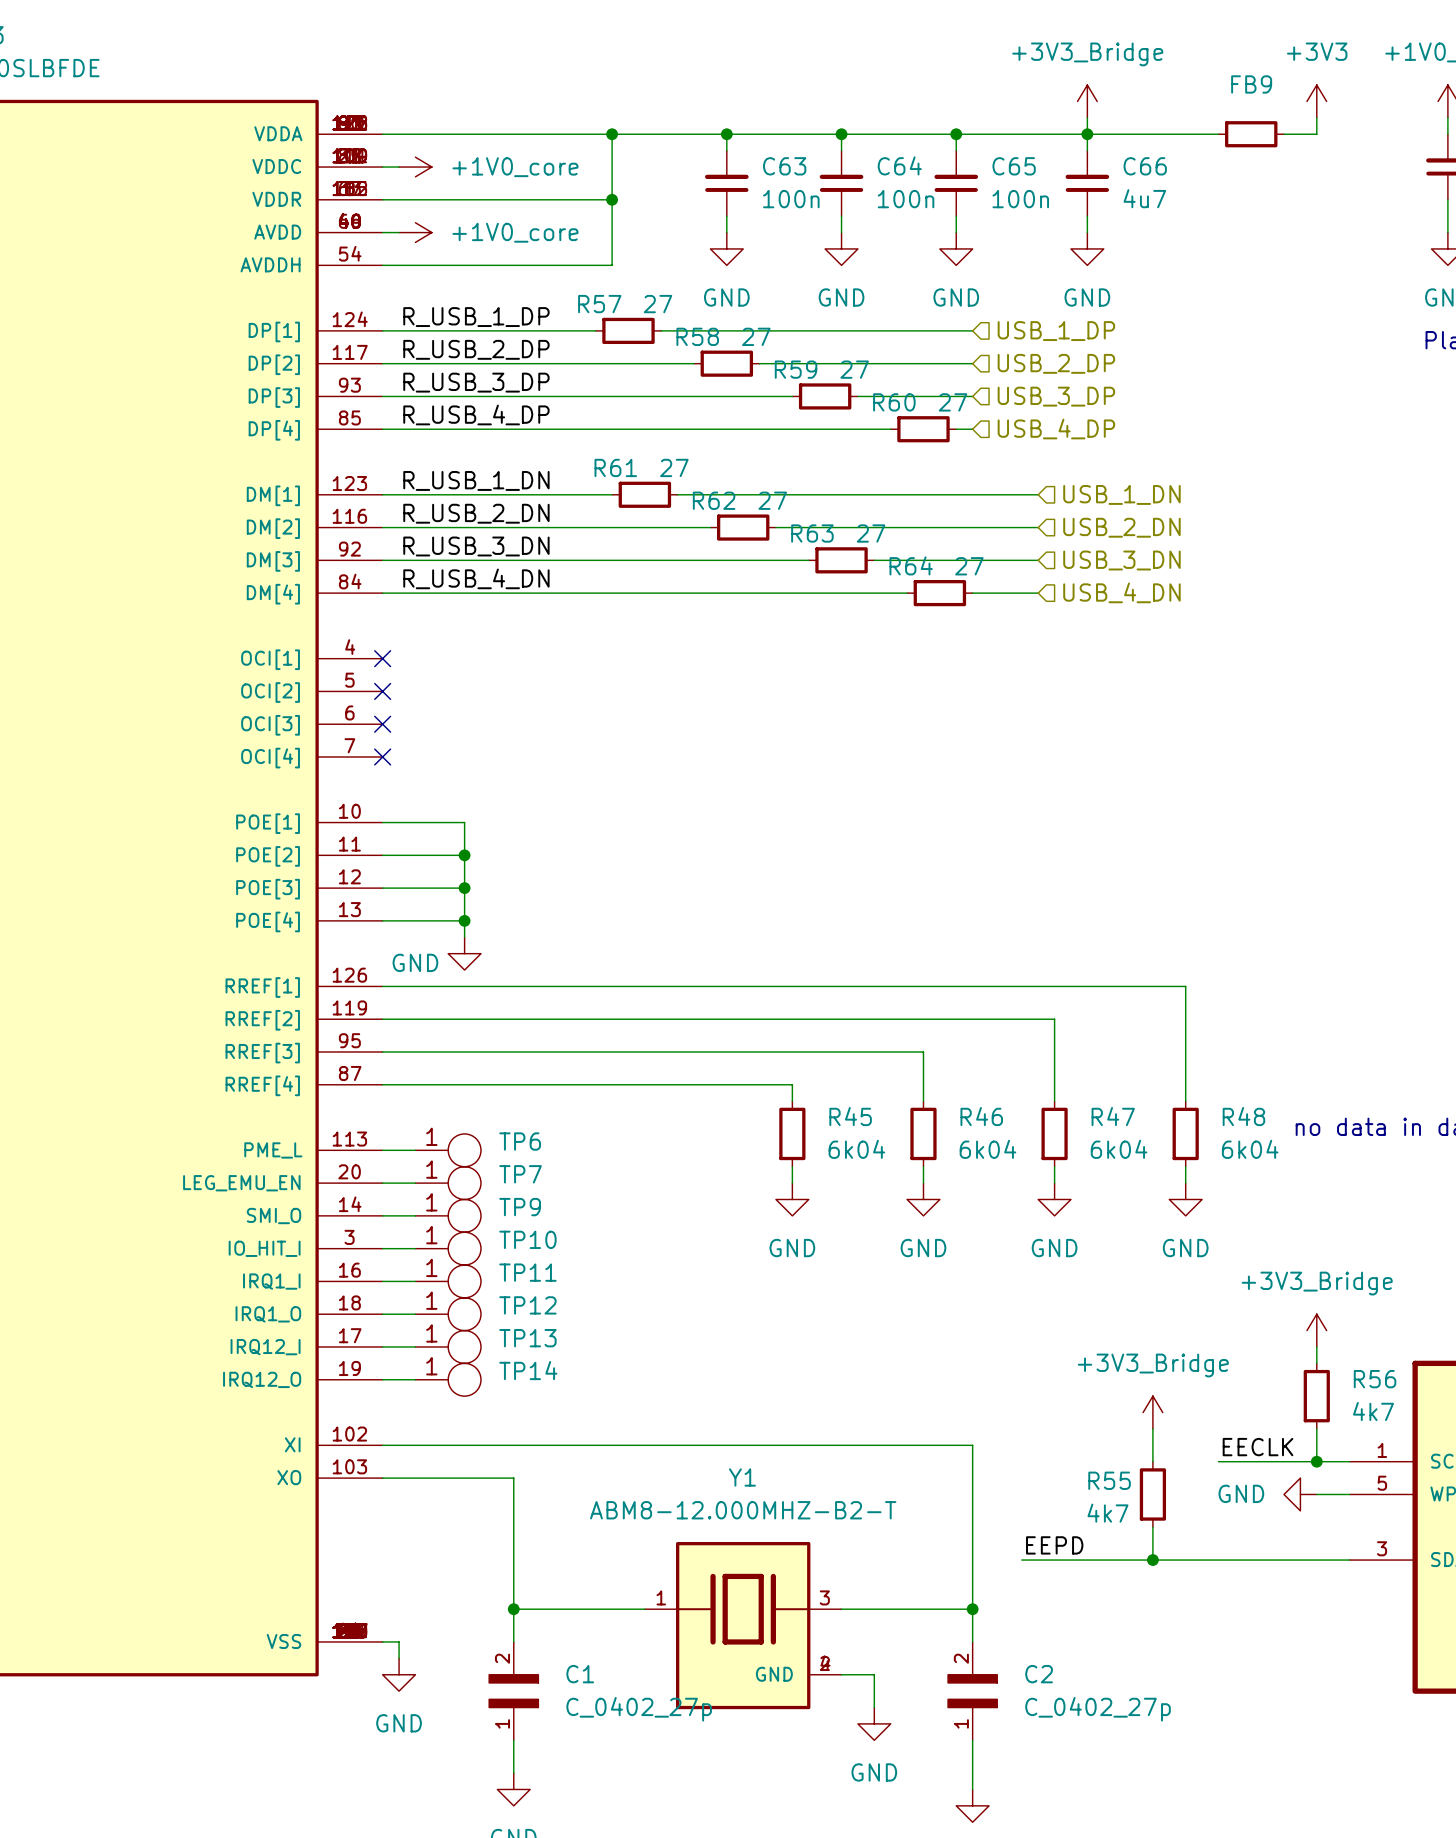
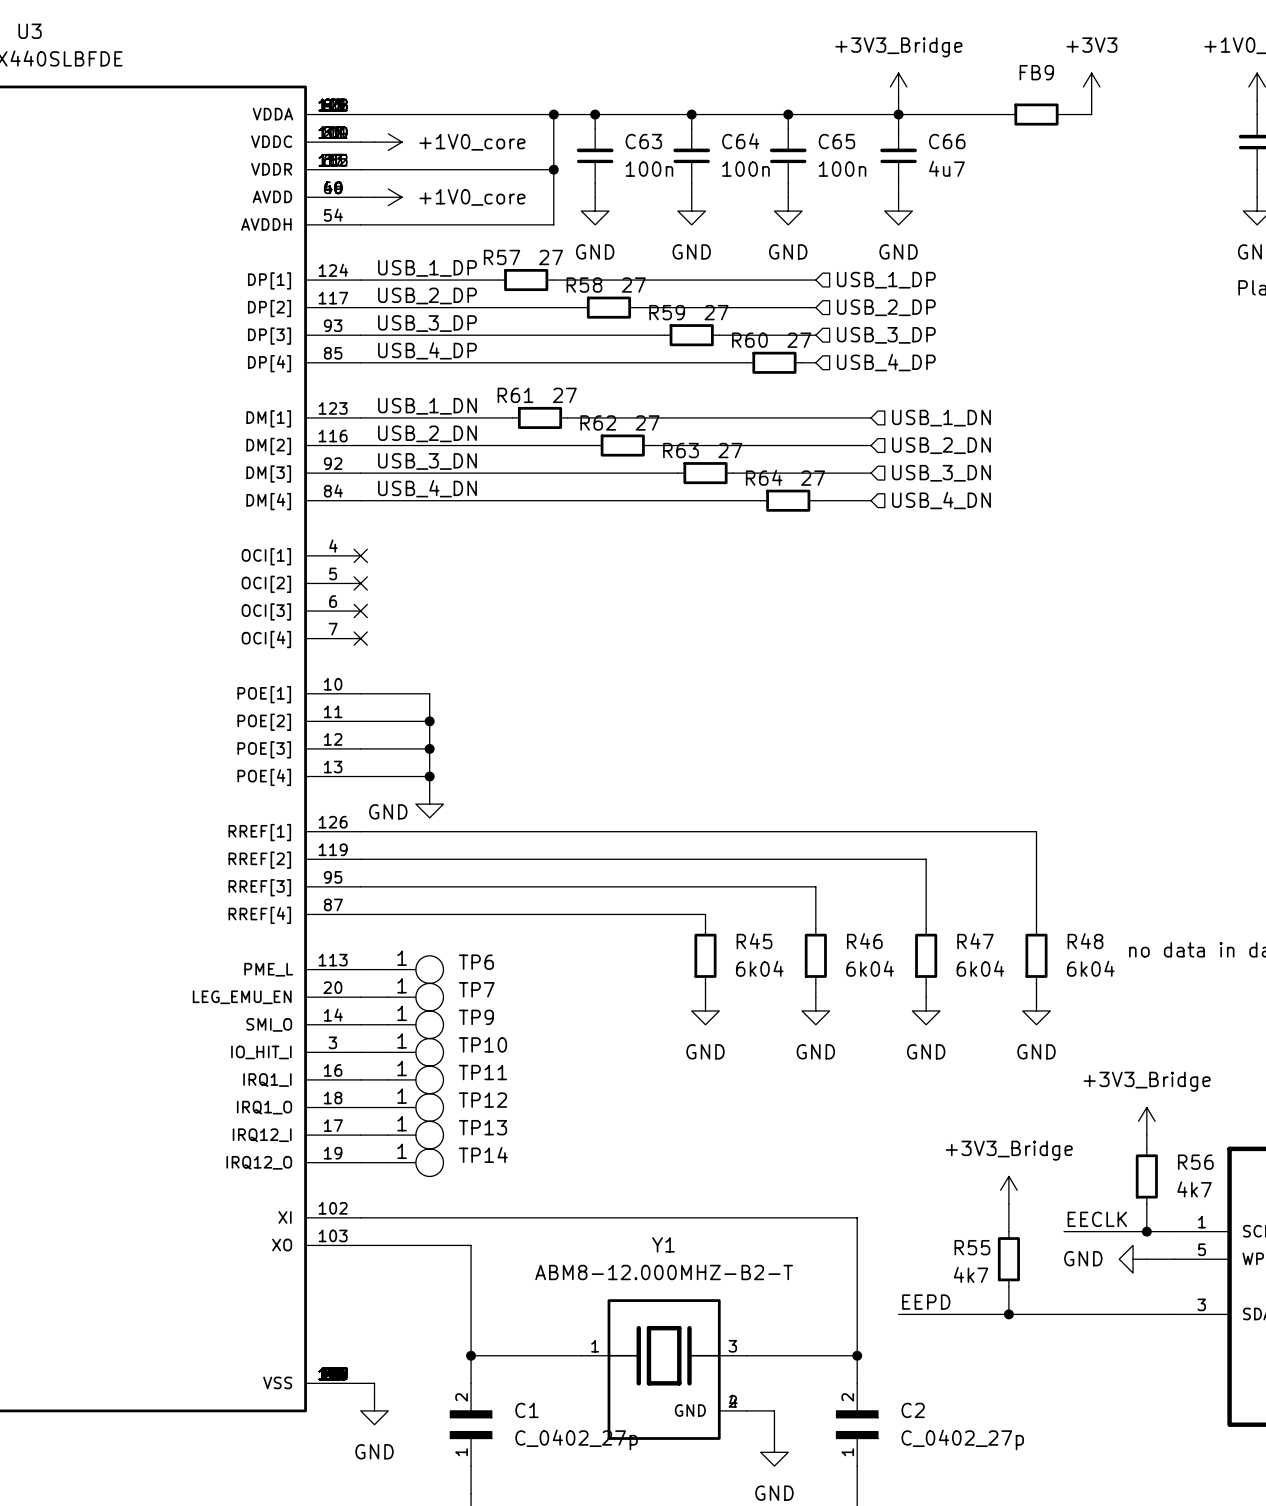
power symbol position: +3V3_Bridge (1087, 101) -> +3V3_Bridge (898, 86)
power symbol position: +3V3 (1316, 101) -> +3V3 (1091, 86)
wire: (1087, 117) (1087, 150) -> (898, 100) (898, 128)
wire: (1316, 117) (1316, 134) (1284, 134) -> none
junction: none -> (595, 114)
wire: (726, 134) (726, 150) -> (595, 114) (595, 128)
junction: (726, 134) -> none
junction: none -> (691, 114)
wire: (841, 134) (841, 150) -> (691, 114) (691, 128)
junction: (841, 134) -> none
junction: none -> (788, 114)
wire: (956, 134) (956, 150) -> (788, 114) (788, 128)
junction: (956, 134) -> none
junction: none -> (898, 114)
junction: (1087, 134) -> none
wire: (1152, 134) (1218, 134) -> (1091, 100) (1091, 114) (1064, 114)
FB9 position: (1251, 134) -> (1036, 114)
C63 position: (726, 183) -> (595, 155)
C64 position: (841, 183) -> (691, 155)
C65 position: (956, 183) -> (788, 155)
C66 position: (1087, 183) -> (898, 155)
wire: (726, 216) (726, 232) -> (595, 183) (595, 197)
wire: (841, 216) (841, 232) -> (691, 183) (691, 197)
wire: (956, 216) (956, 232) -> (788, 183) (788, 197)
wire: (1087, 216) (1087, 232) -> (898, 183) (898, 197)
power symbol: none -> GND (595, 211)
power symbol: GND (726, 248) -> none
power symbol: none -> GND (691, 211)
power symbol: GND (841, 248) -> none
power symbol: none -> GND (788, 211)
power symbol: GND (956, 248) -> none
power symbol: none -> GND (898, 211)
power symbol: GND (1087, 248) -> none
label: R_USB_1_DP (476, 317) -> USB_1_DP (427, 268)
wire: (546, 330) (595, 330) -> (553, 280) (595, 280)
R57 position: (628, 330) -> (526, 280)
wire: (923, 330) (972, 330) -> none
hierarchical label position: USB_1_DP (1056, 331) -> USB_1_DP (886, 280)
label: R_USB_2_DP (476, 349) -> USB_2_DP (427, 295)
wire: (644, 363) (694, 363) -> (636, 307) (677, 307)
R58 position: (726, 363) -> (608, 307)
wire: (923, 363) (972, 363) -> none
hierarchical label position: USB_2_DP (1056, 363) -> USB_2_DP (886, 307)
label: R_USB_3_DP (476, 382) -> USB_3_DP (427, 323)
wire: (743, 396) (792, 396) -> (719, 335) (760, 335)
R59 position: (825, 396) -> (691, 335)
wire: (923, 396) (972, 396) -> none
hierarchical label position: USB_3_DP (1056, 396) -> USB_3_DP (886, 335)
label: R_USB_4_DP (476, 415) -> USB_4_DP (427, 350)
wire: (841, 429) (890, 429) -> none
R60 position: (923, 429) -> (774, 362)
wire: (956, 429) (972, 429) -> (802, 362) (815, 362)
hierarchical label position: USB_4_DP (1056, 429) -> USB_4_DP (886, 362)
label: R_USB_1_DN (476, 480) -> USB_1_DN (427, 406)
wire: (562, 494) (612, 494) -> (567, 417) (608, 417)
R61 position: (644, 494) -> (540, 417)
wire: (989, 494) (1038, 494) -> none
hierarchical label position: USB_1_DN (1121, 494) -> USB_1_DN (941, 418)
label: R_USB_2_DN (476, 513) -> USB_2_DN (427, 433)
wire: (661, 527) (710, 527) -> (650, 445) (691, 445)
R62 position: (743, 527) -> (622, 445)
wire: (989, 527) (1038, 527) -> none
hierarchical label position: USB_2_DN (1121, 527) -> USB_2_DN (941, 445)
label: R_USB_3_DN (476, 546) -> USB_3_DN (427, 461)
wire: (759, 560) (808, 560) -> (733, 473) (774, 473)
R63 position: (841, 560) -> (705, 473)
wire: (989, 560) (1038, 560) -> none
hierarchical label position: USB_3_DN (1121, 560) -> USB_3_DN (941, 473)
label: R_USB_4_DN (476, 578) -> USB_4_DN (427, 488)
hierarchical label position: USB_4_DN (1121, 592) -> USB_4_DN (941, 500)
wire: (857, 593) (907, 593) -> none
R64 position: (939, 593) -> (788, 500)
wire: (989, 593) (1038, 593) -> (815, 500) (857, 500)

